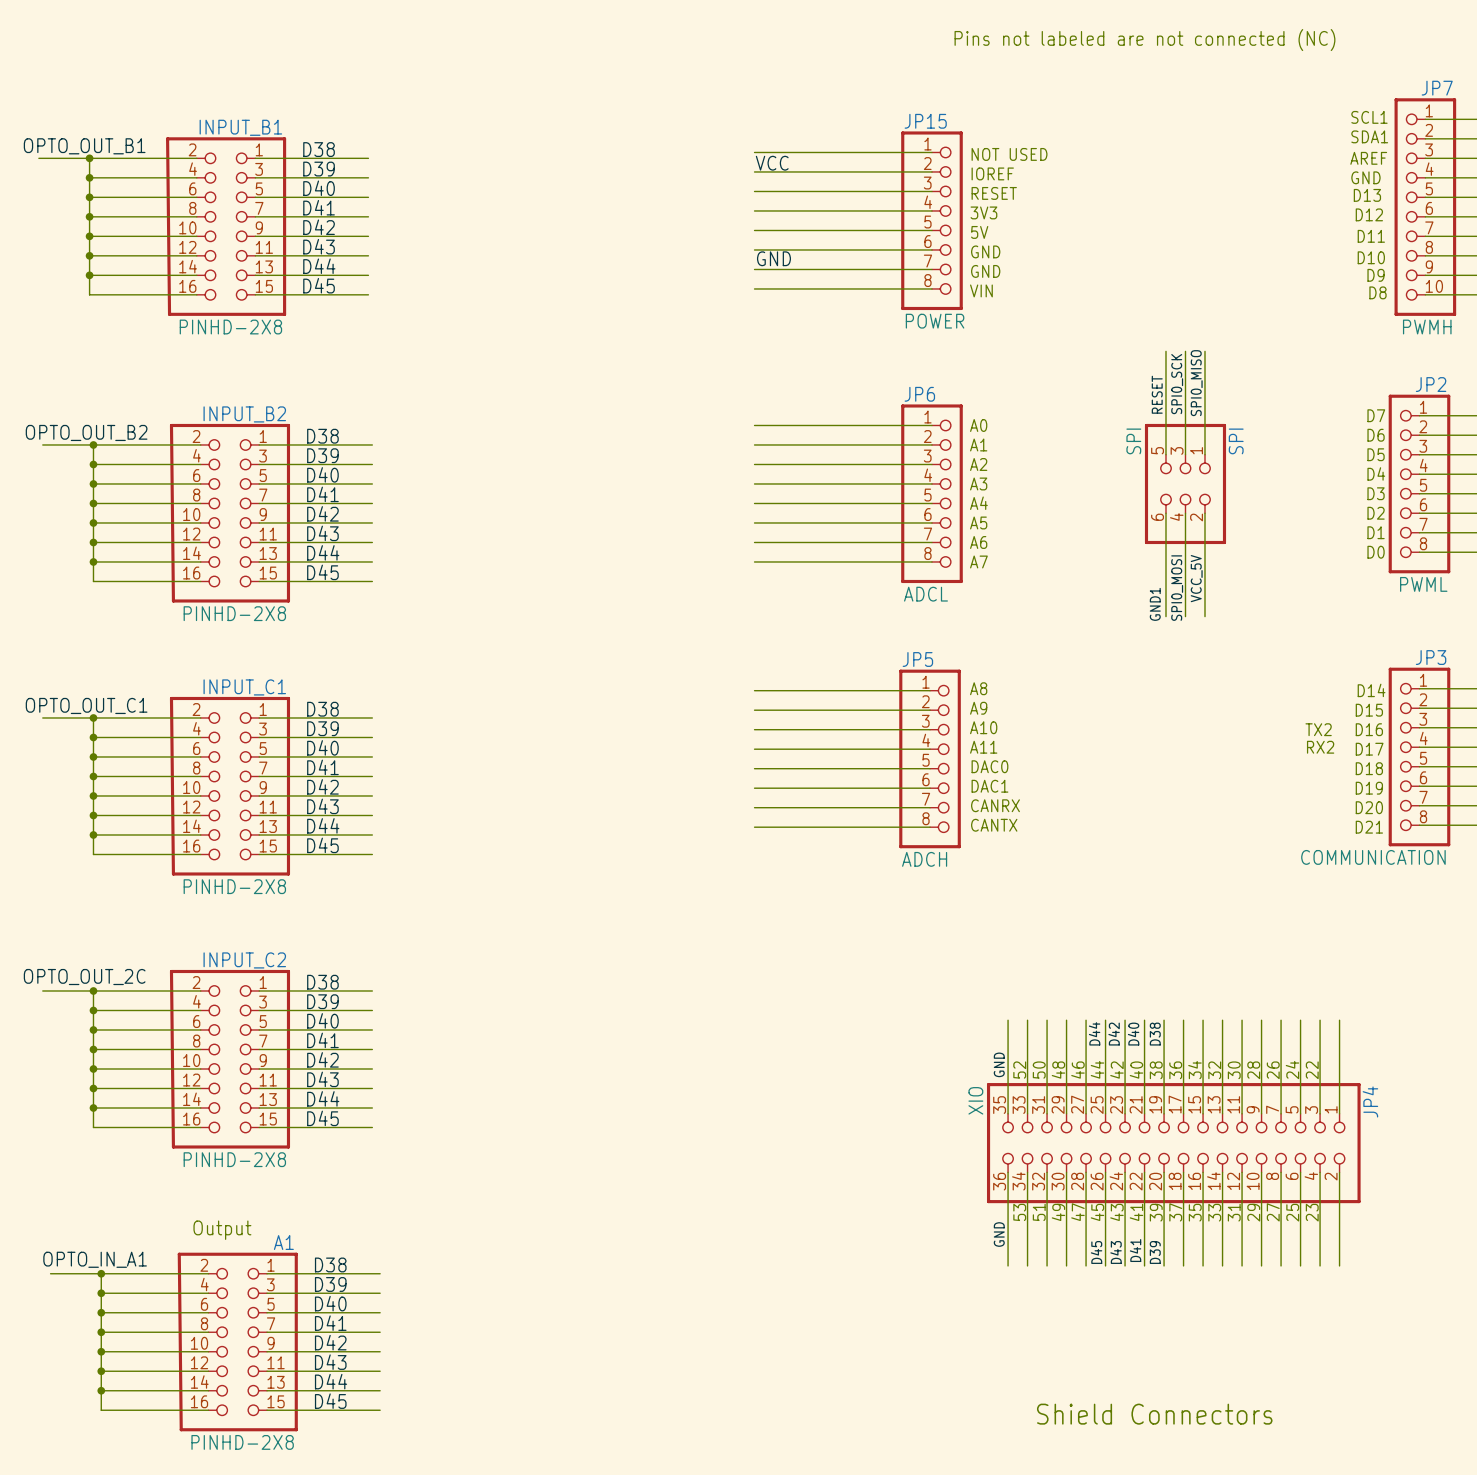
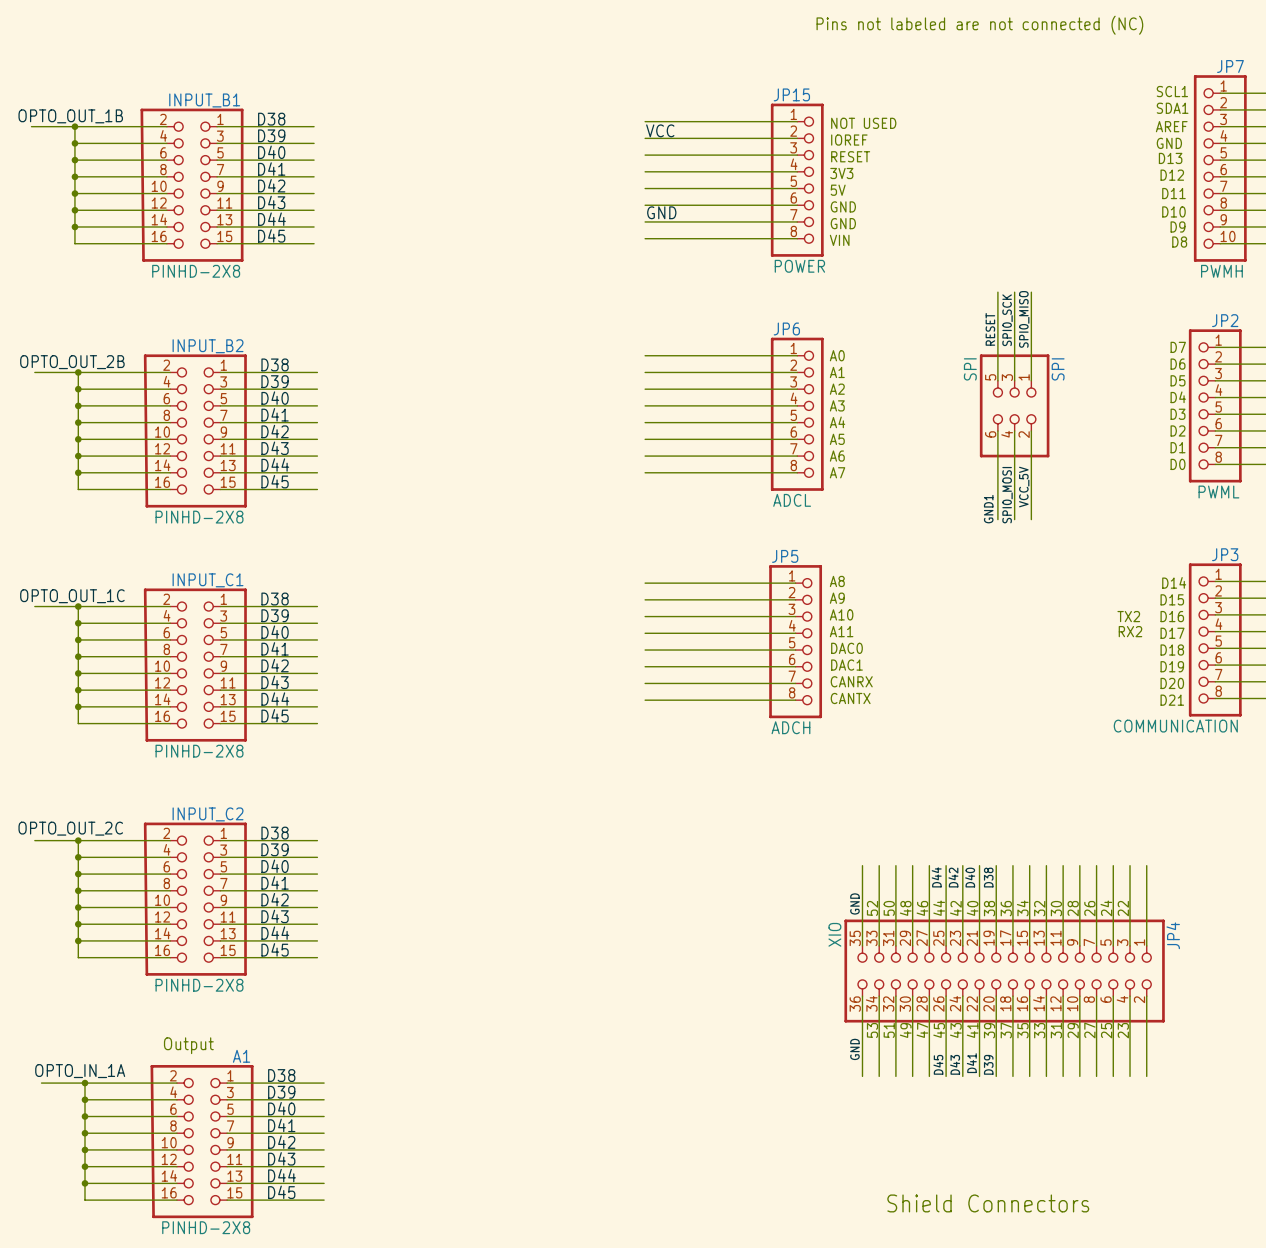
label: OPTO_OUT_B1 (84, 146) -> OPTO_OUT_1B (70, 116)
label: OPTO_OUT_B2 (86, 432) -> OPTO_OUT_2B (72, 362)
label: OPTO_OUT_C1 (86, 705) -> OPTO_OUT_1C (72, 596)
label: OPTO_IN_A1 (95, 1259) -> OPTO_IN_1A (80, 1071)

